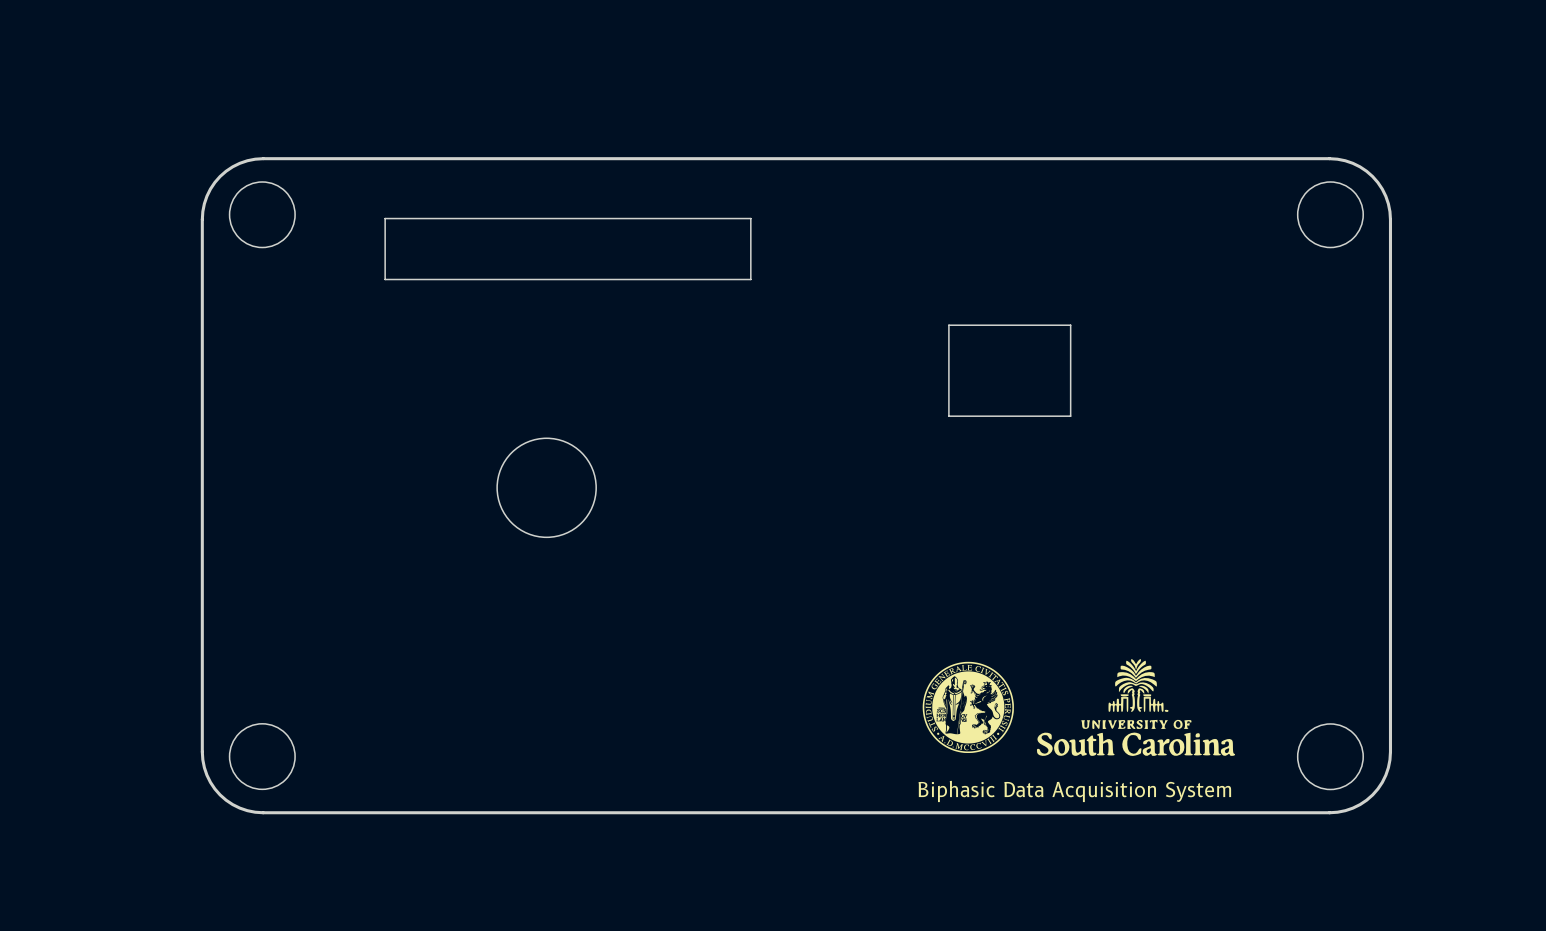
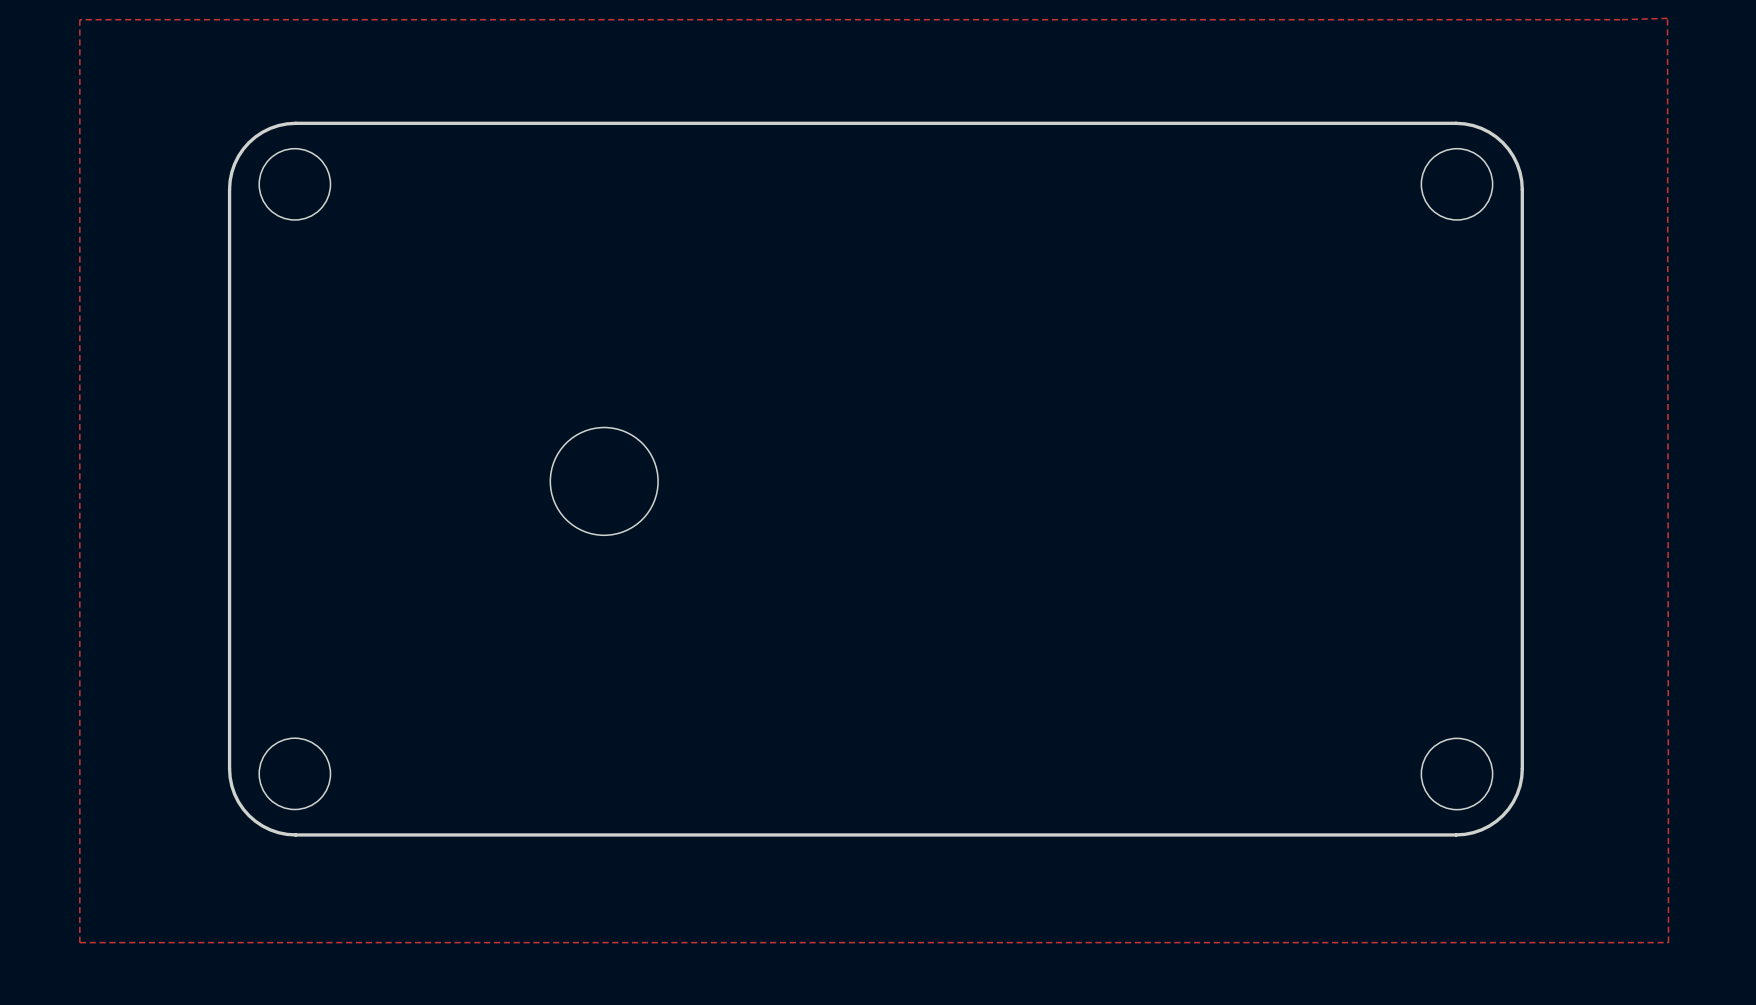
top zone outline: none -> (1667, 18) (1668, 942) (79, 942) (79, 19) (1667, 18)
board edge: (750, 218) (385, 218) (385, 279) (750, 279) (750, 218) -> none
board edge: (1070, 325) (948, 325) (948, 416) (1070, 416) (1070, 325) -> none
drawing: [1036, 659, 1236, 756] -> none
drawing: [922, 661, 1014, 754] -> none
text: Biphasic Data Acquisition System (1074, 791) -> none

